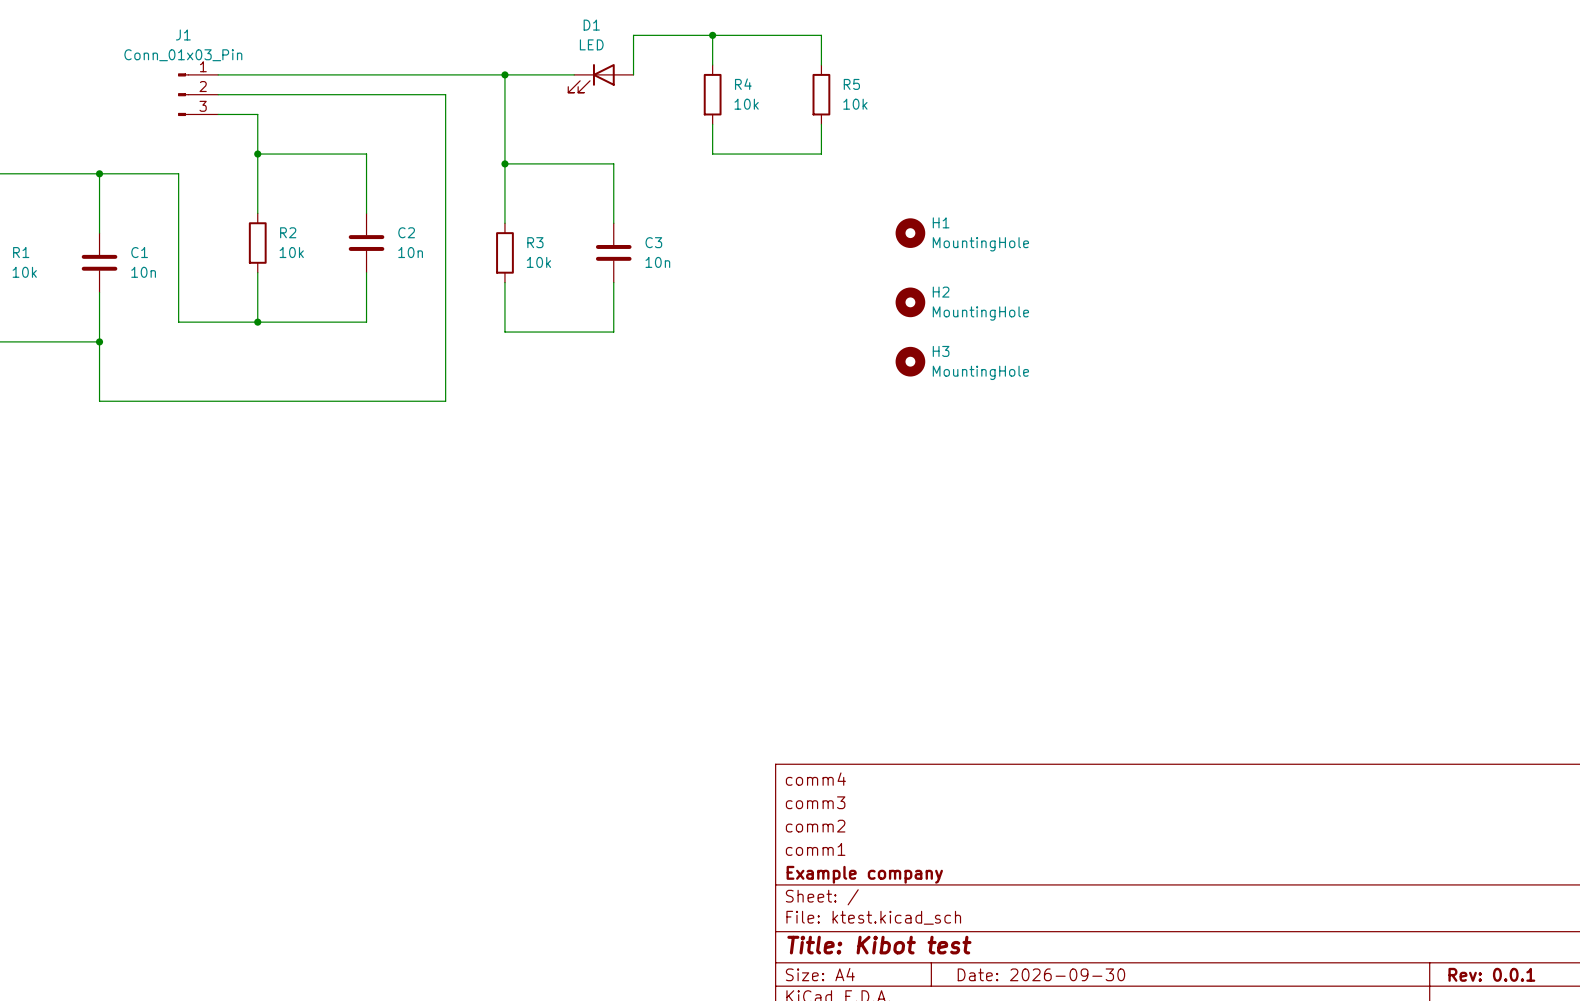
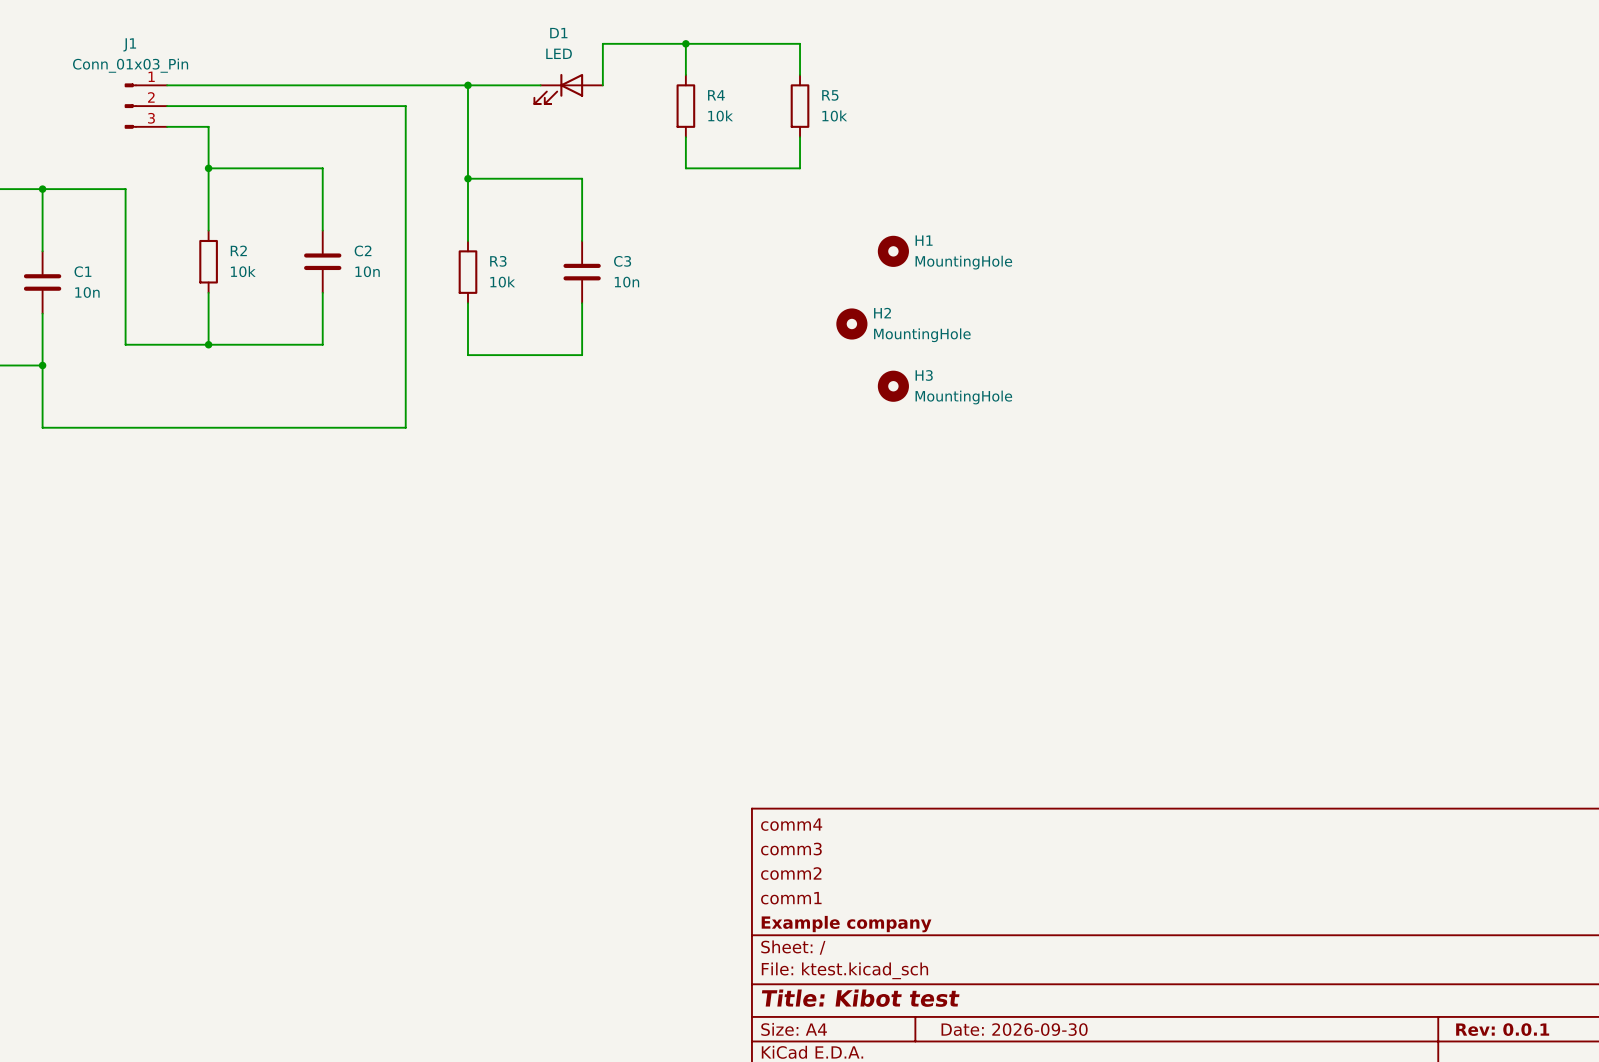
H2 position: (910, 302) -> (851, 323)

